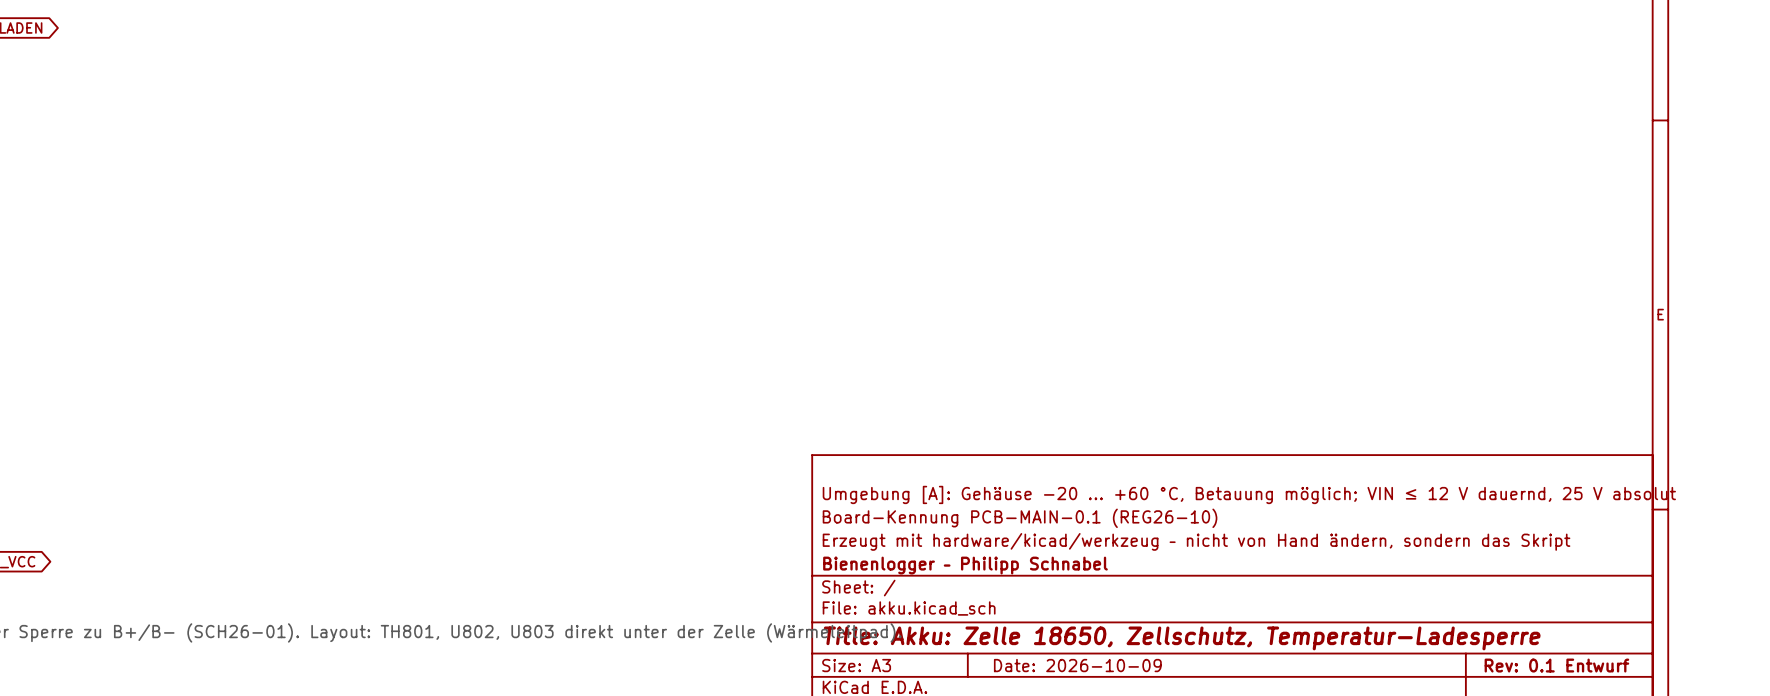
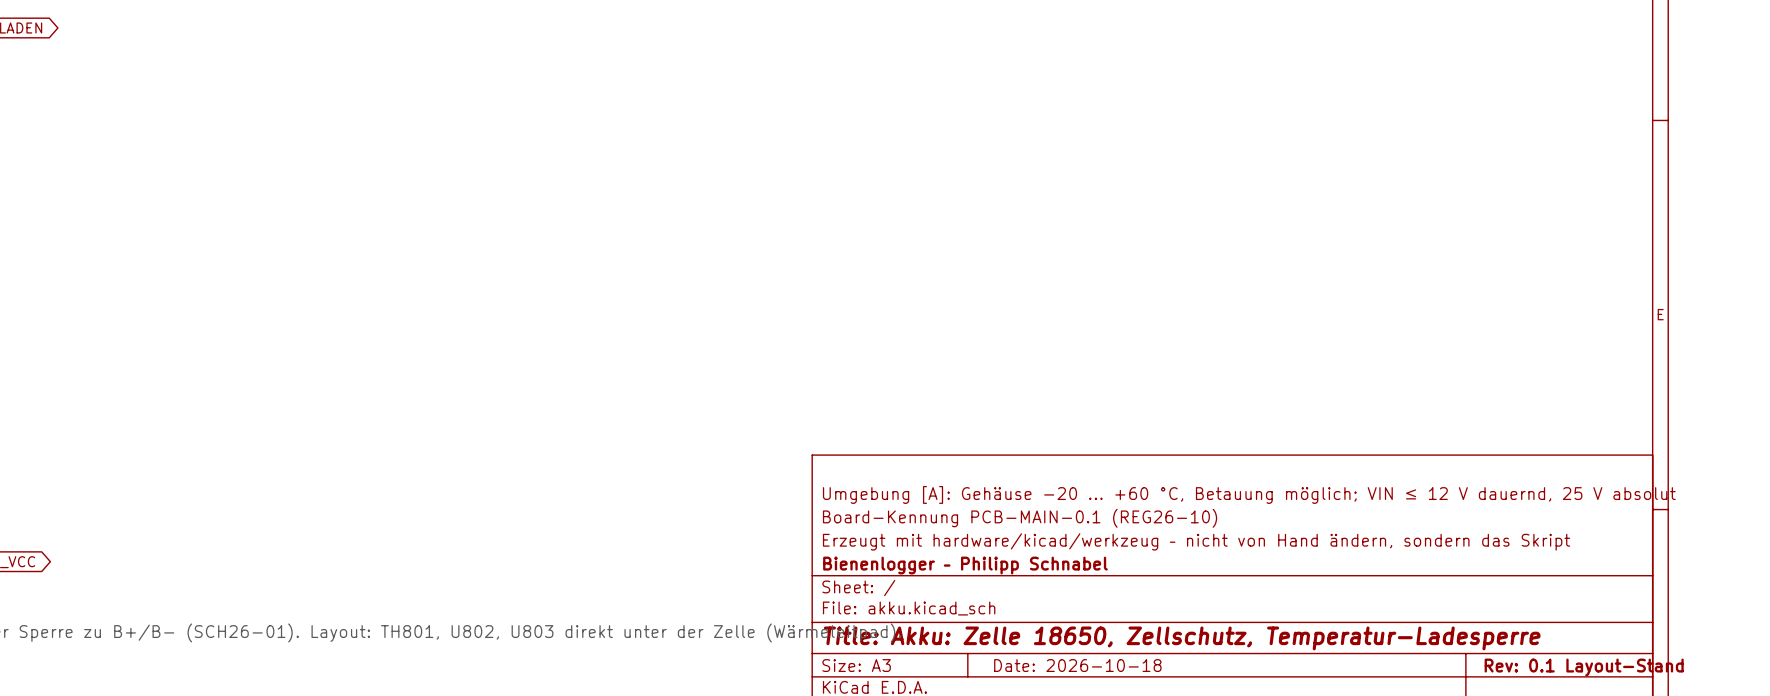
title block: Date: 2026-10-09 (1077, 665) -> Date: 2026-10-18 (1077, 665)
title block: Rev: 0.1 Entwurf (1556, 665) -> Rev: 0.1 Layout-Stand (1584, 667)

